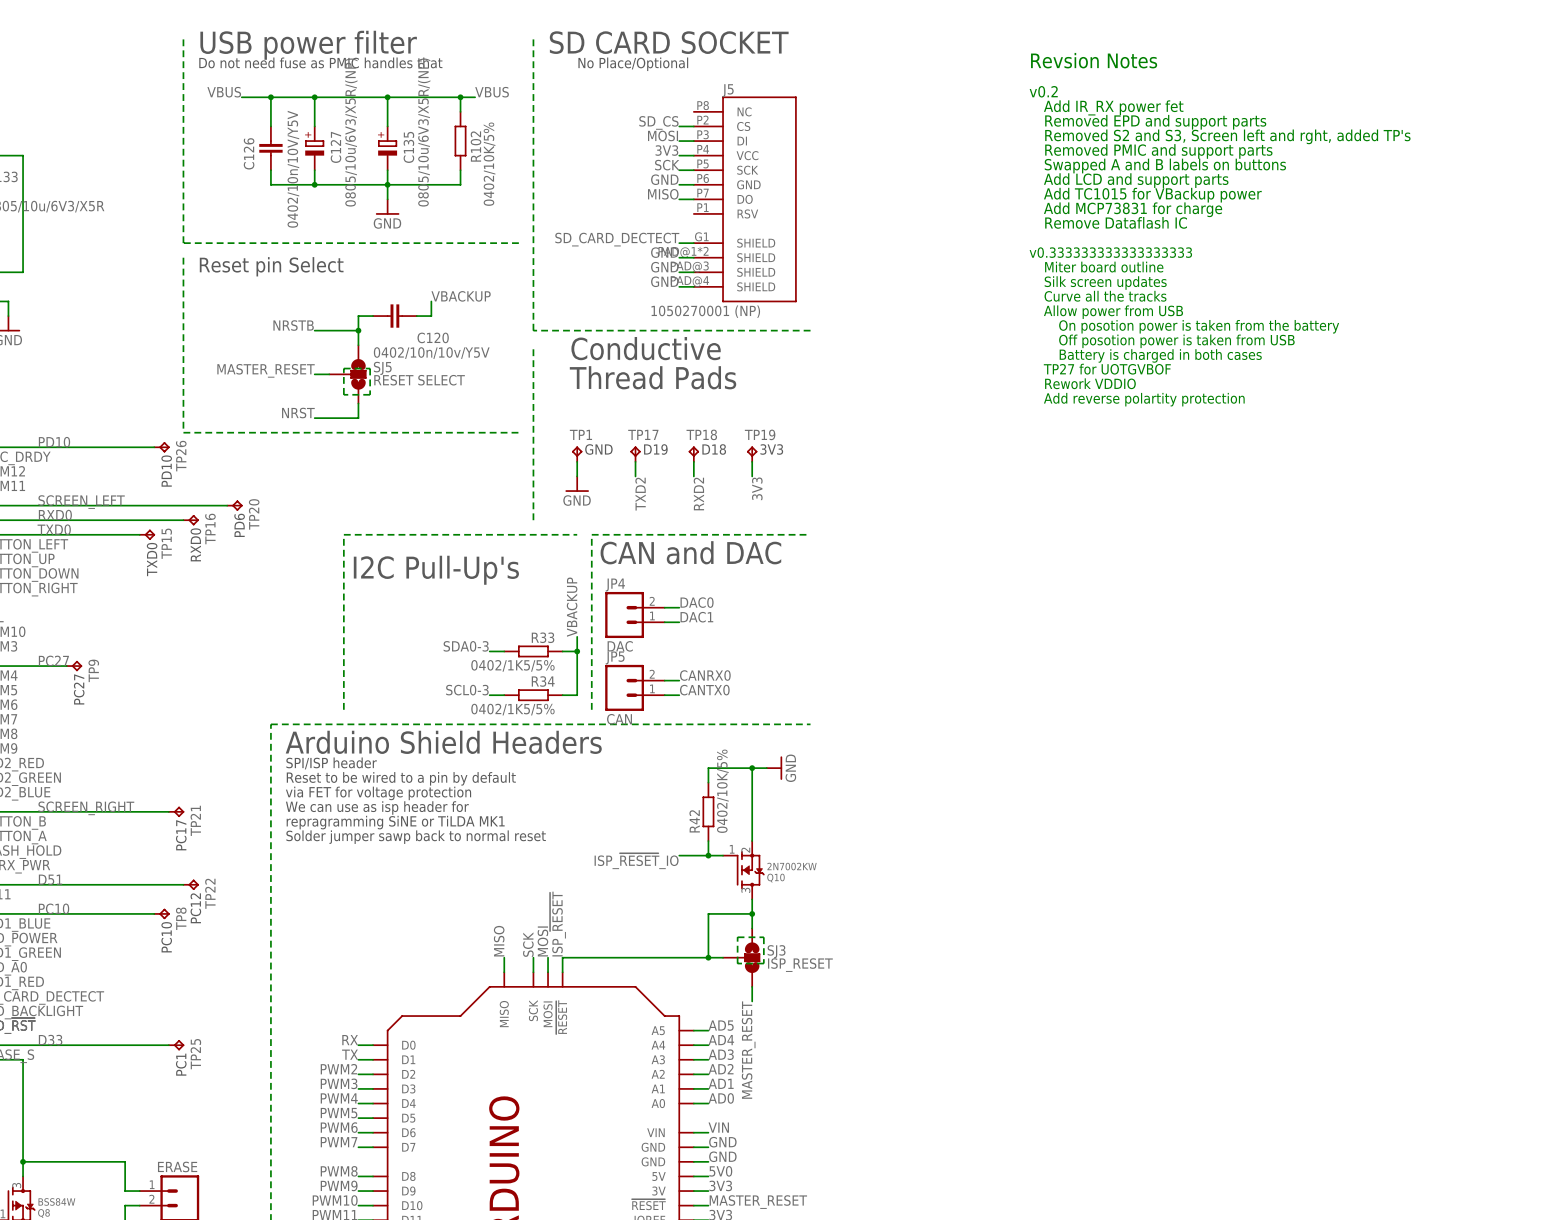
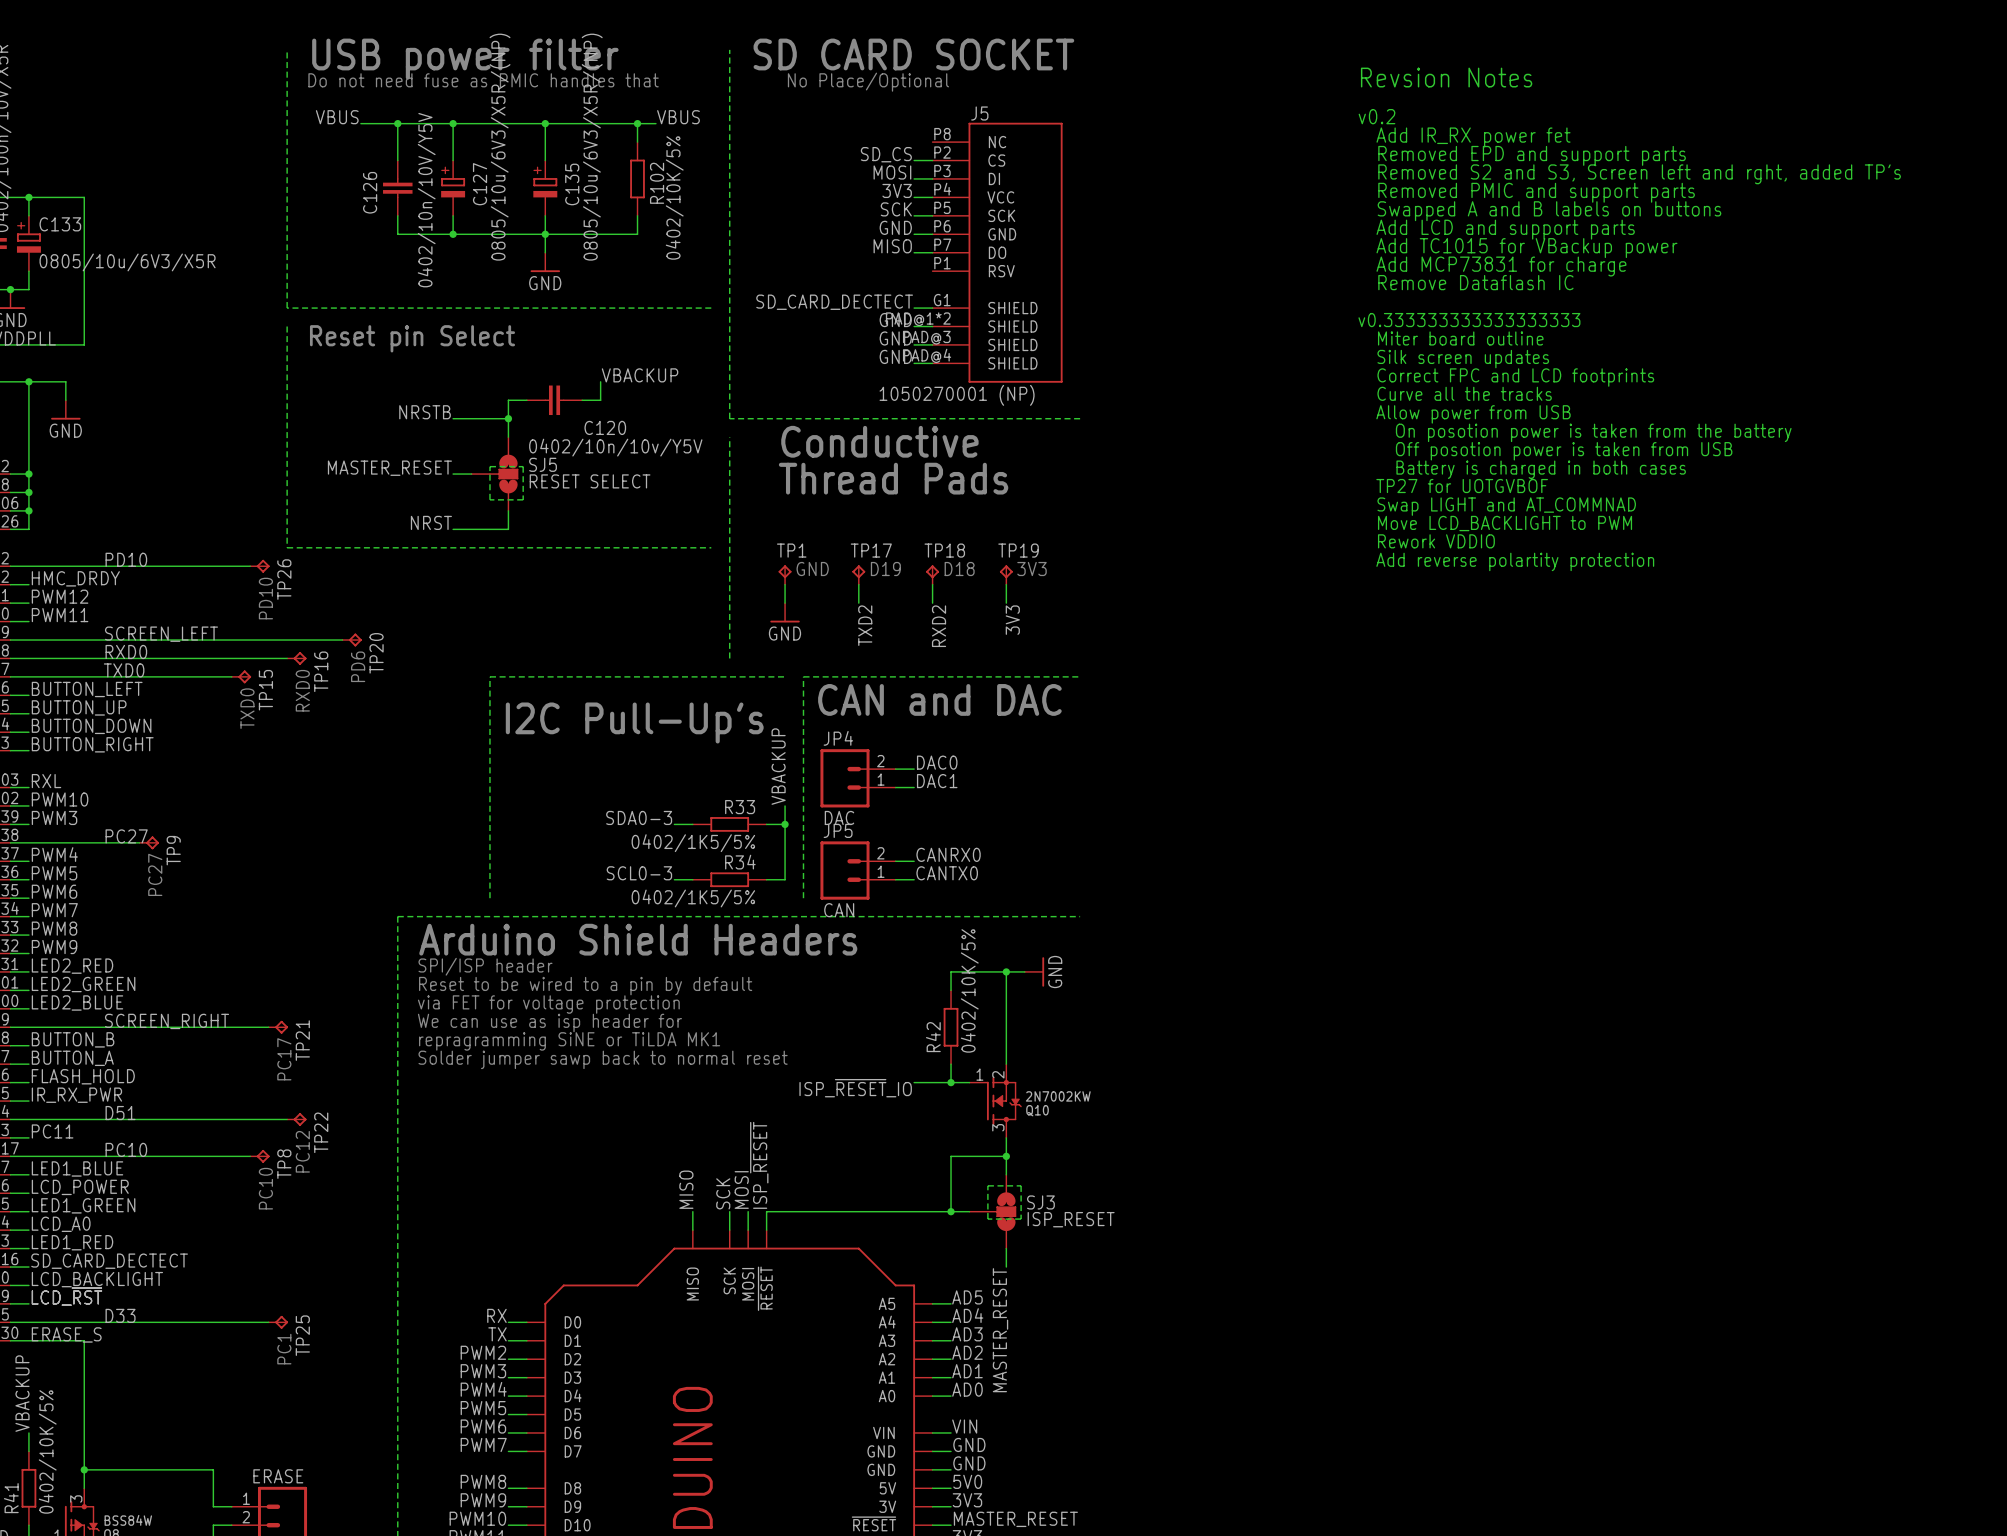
text: Curve all the tracks (1105, 296) -> Correct FPC and LCD footprints (1515, 377)
text: Allow power from USB (1113, 312) -> Curve all the tracks (1464, 393)
text: none -> Allow power from USB (1473, 414)
text: On posotion power is taken from the battery (1199, 326) -> none
text: Off posotion power is taken from USB (1176, 341) -> On posotion power is taken from the battery (1593, 432)
text: Battery is charged in both cases (1160, 355) -> Off posotion power is taken from USB (1564, 451)
text: TP27 for UOTGVBOF (1107, 369) -> none
text: none -> Battery is charged in both cases (1541, 469)
text: Rework VDDIO (1090, 383) -> TP27 for UOTGVBOF (1462, 486)
text: Add reverse polartity protection (1144, 399) -> Swap LIGHT and AT_COMMNAD (1506, 506)
text: none -> Move LCD_BACKLIGHT to PWM (1505, 523)
text: none -> Rework VDDIO (1436, 541)
text: none -> Add reverse polartity protection (1515, 561)

